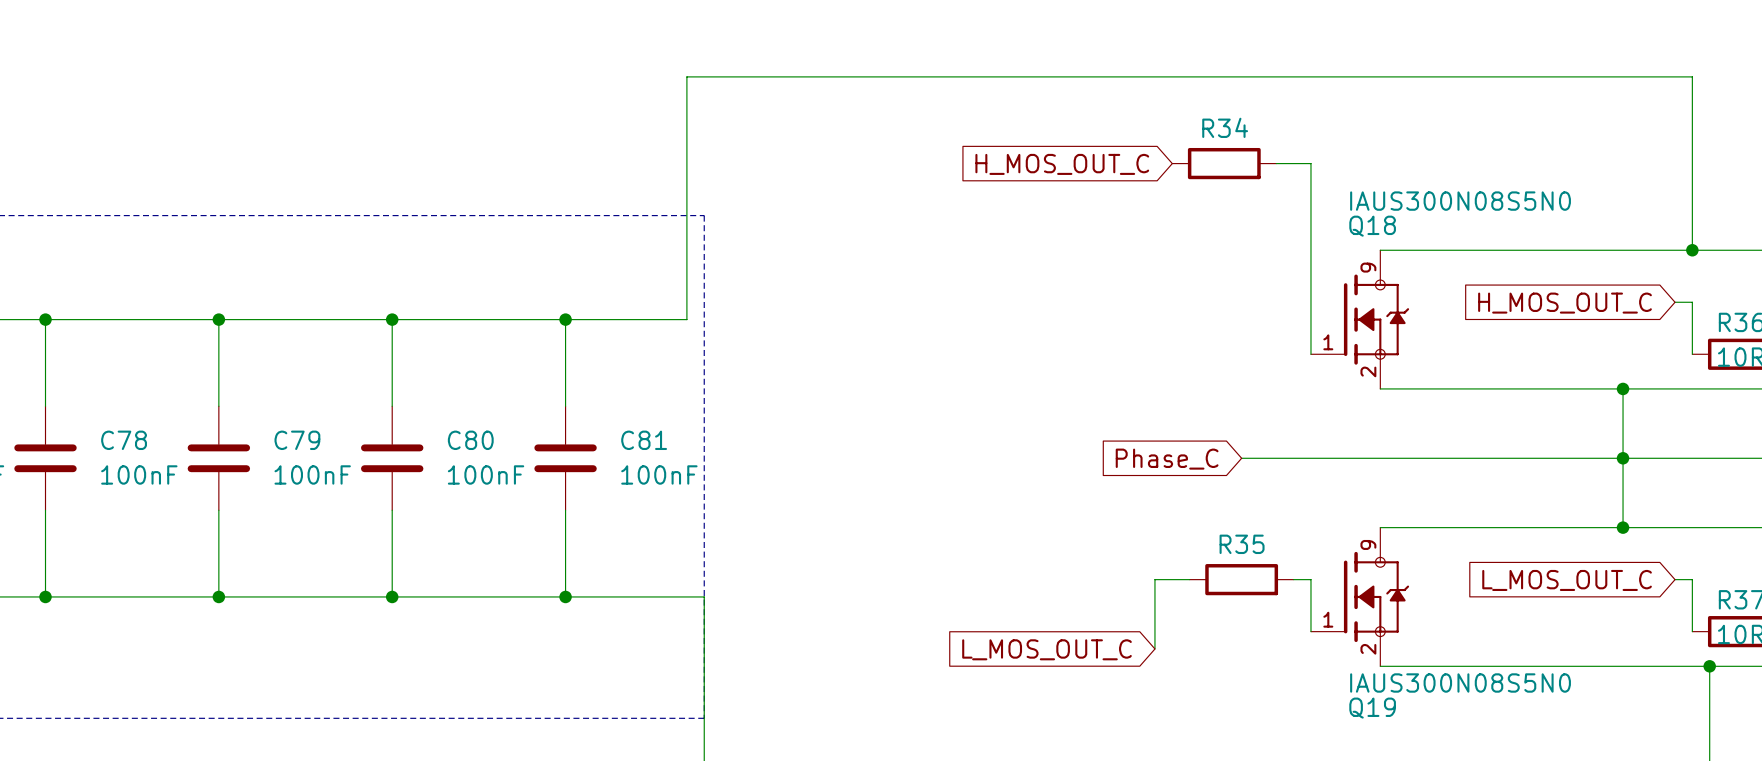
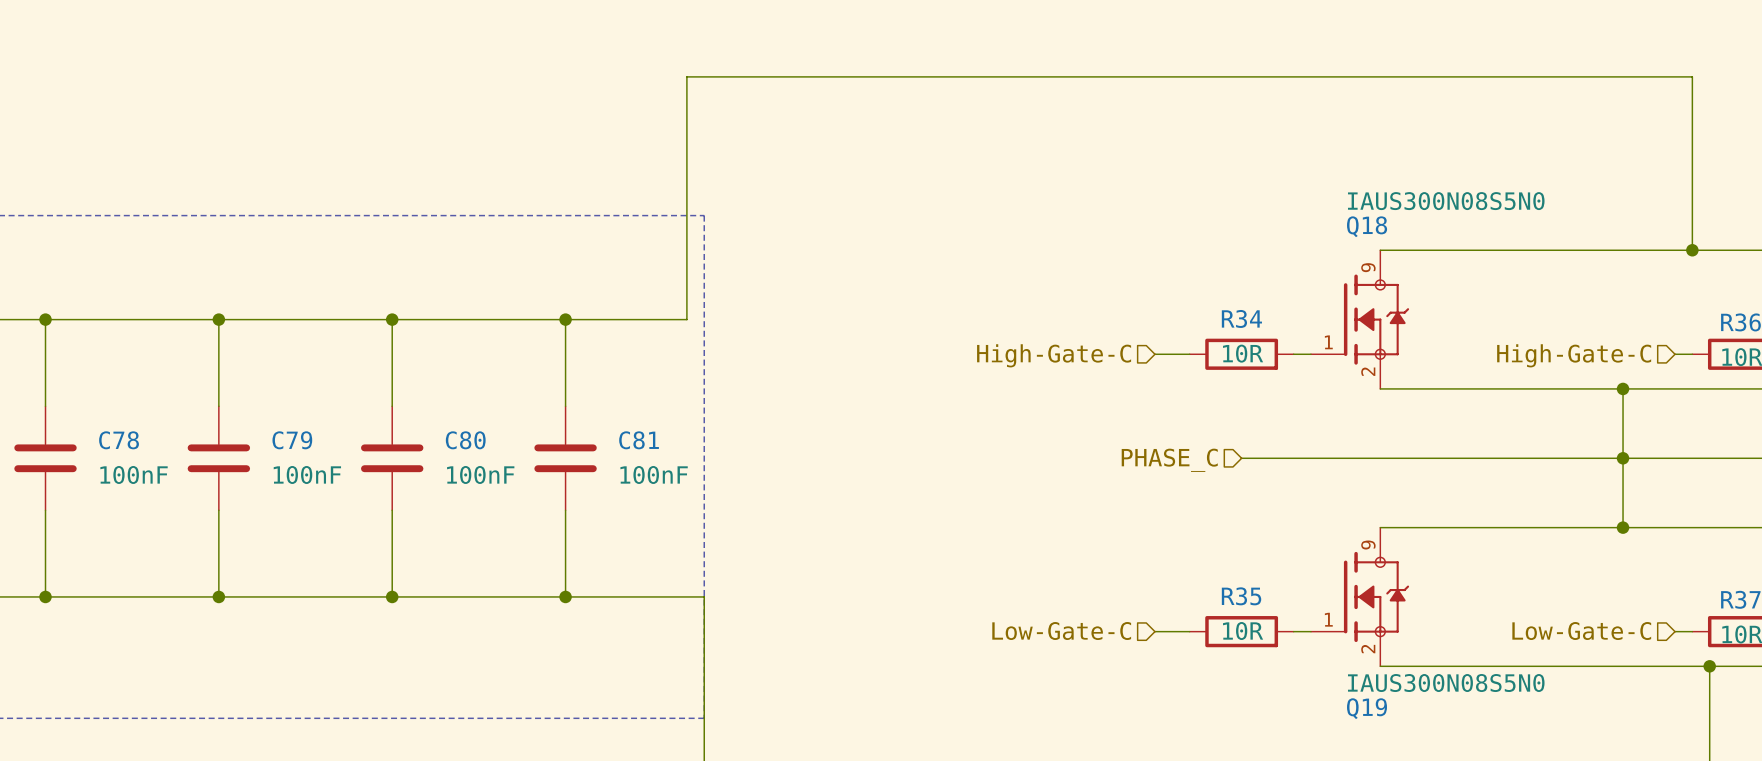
R34 position: (1224, 163) -> (1241, 354)
wire: (1276, 163) (1310, 163) (1310, 354) -> (1293, 354) (1310, 354)
global label: H_MOS_OUT_C (1062, 164) -> none
wire: (1675, 302) (1692, 302) (1692, 354) -> (1675, 354) (1692, 354)
global label: H_MOS_OUT_C (1565, 303) -> none
R34 value: none -> 10R (1243, 353)
wire: none -> (1154, 354) (1189, 354)
hierarchical label: none -> High-Gate-C (1054, 355)
hierarchical label: none -> High-Gate-C (1574, 355)
hierarchical label: none -> PHASE_C (1169, 460)
global label: Phase_C (1167, 459) -> none
wire: (1189, 579) (1154, 579) (1154, 648) -> none
R35 position: (1241, 579) -> (1241, 631)
wire: (1293, 579) (1310, 579) (1310, 631) -> (1293, 631) (1310, 631)
wire: (1675, 579) (1692, 579) (1692, 631) -> (1675, 631) (1692, 631)
global label: L_MOS_OUT_C (1567, 580) -> none
hierarchical label: none -> Low-Gate-C (1061, 631)
R35 value: none -> 10R (1243, 631)
hierarchical label: none -> Low-Gate-C (1581, 631)
wire: none -> (1154, 631) (1189, 631)
global label: L_MOS_OUT_C (1047, 649) -> none

